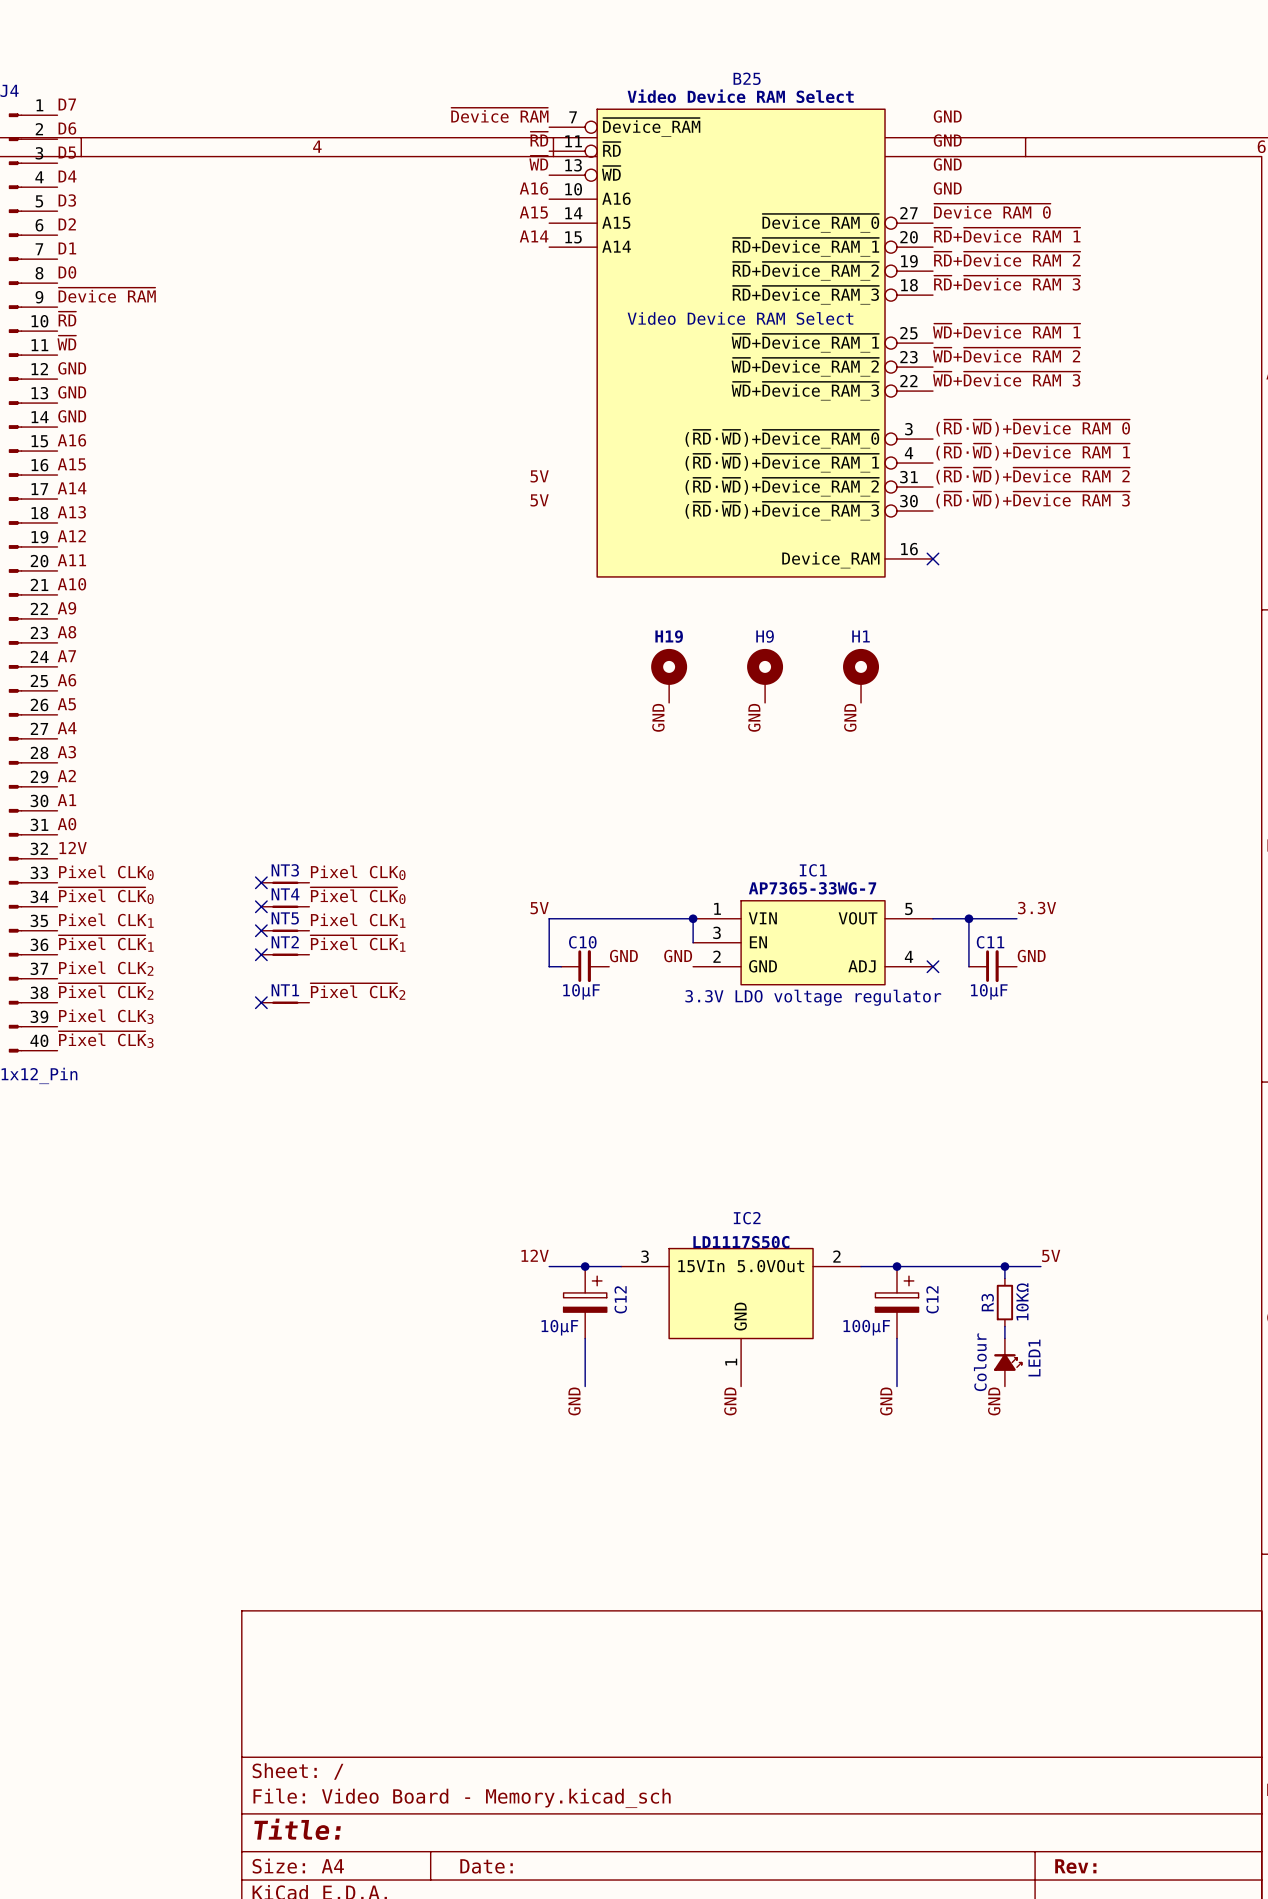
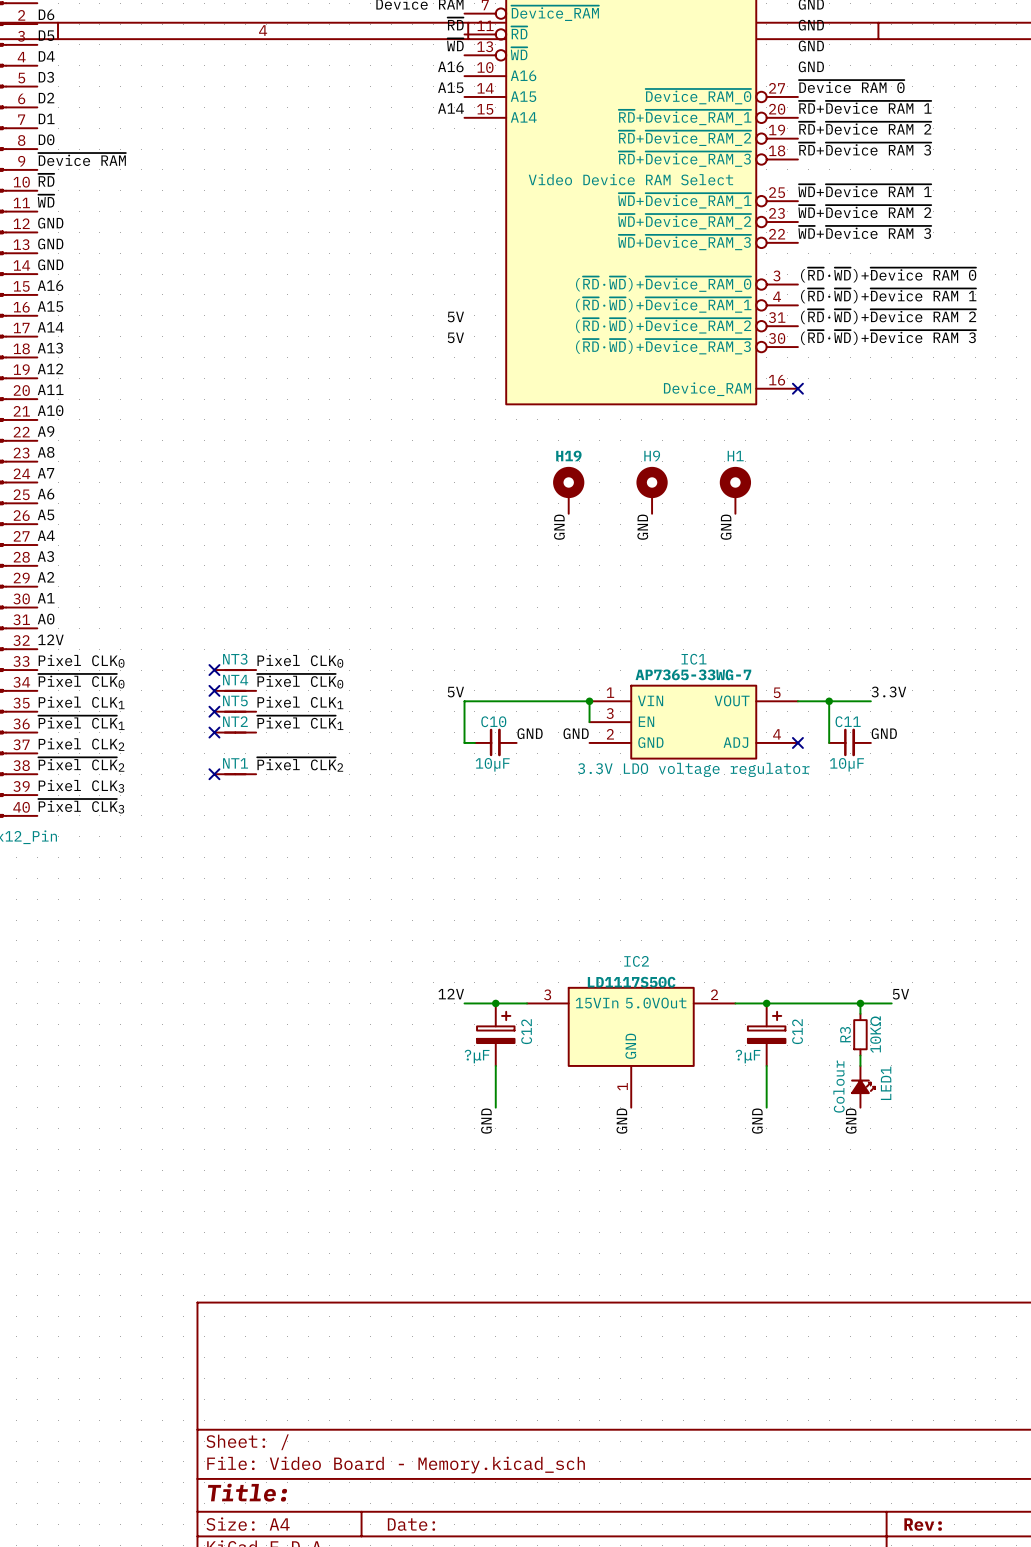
C12 text: 10μF (559, 1327) -> ?μF (477, 1056)
C12 text: 100μF (866, 1327) -> ?μF (748, 1056)

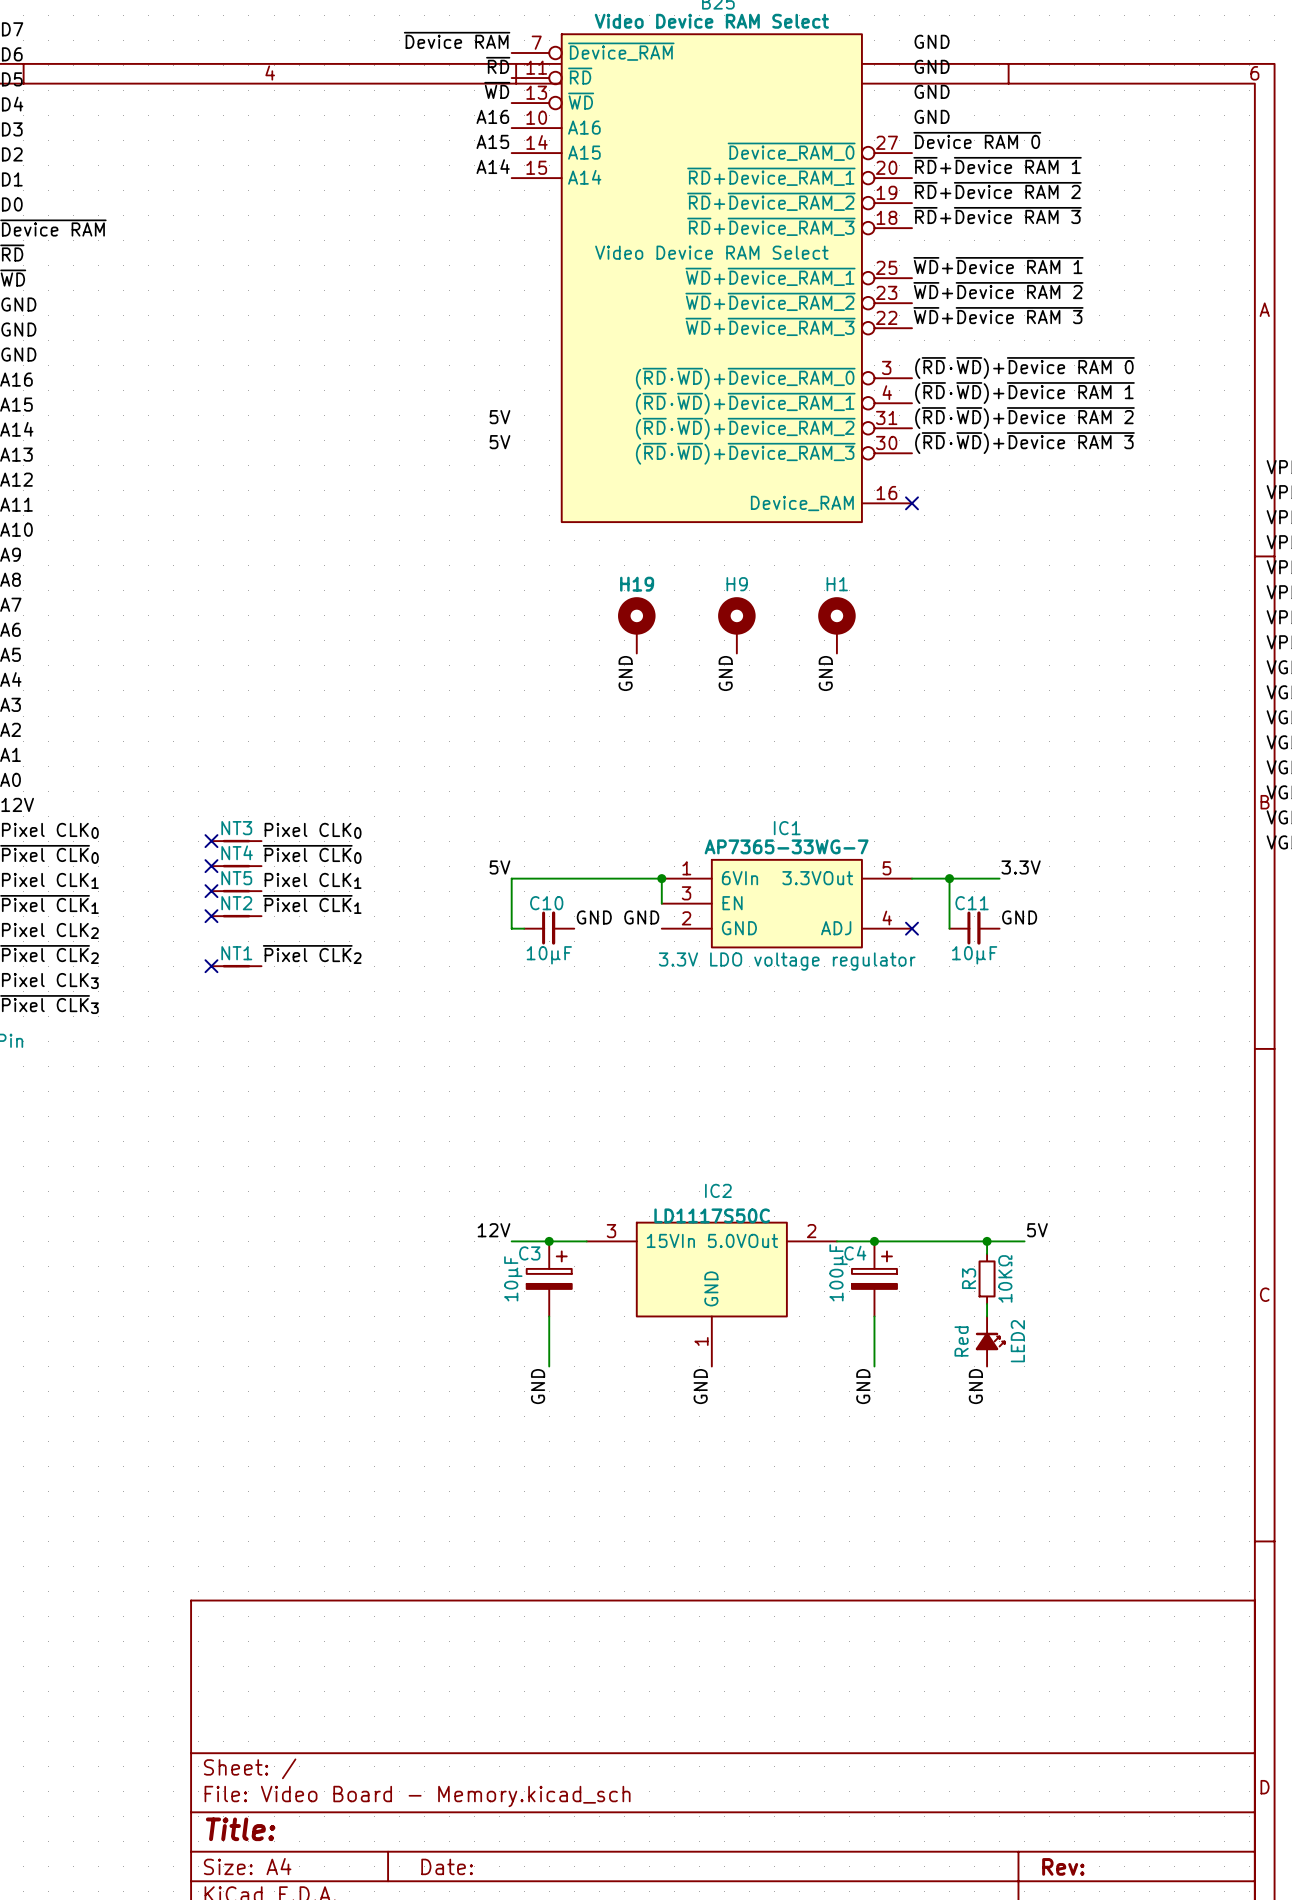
IC1 pin name: VIN (650, 700) -> 6VIn (739, 878)
IC1 pin name: VOUT (732, 700) -> 3.3VOut (817, 878)
C12 name: C12 (526, 1031) -> C3 (529, 1253)
C12 name: C12 (797, 1031) -> C4 (855, 1253)
C12 value: none -> 100μF (838, 1272)
C12 value: none -> 10μF (513, 1278)
C12 text: ?μF (477, 1056) -> none
C12 text: ?μF (748, 1056) -> none
LED1 name: LED1 (886, 1083) -> LED2 (1017, 1341)
LED1 text: Colour (838, 1086) -> none
LED1 value: none -> Red (961, 1341)

